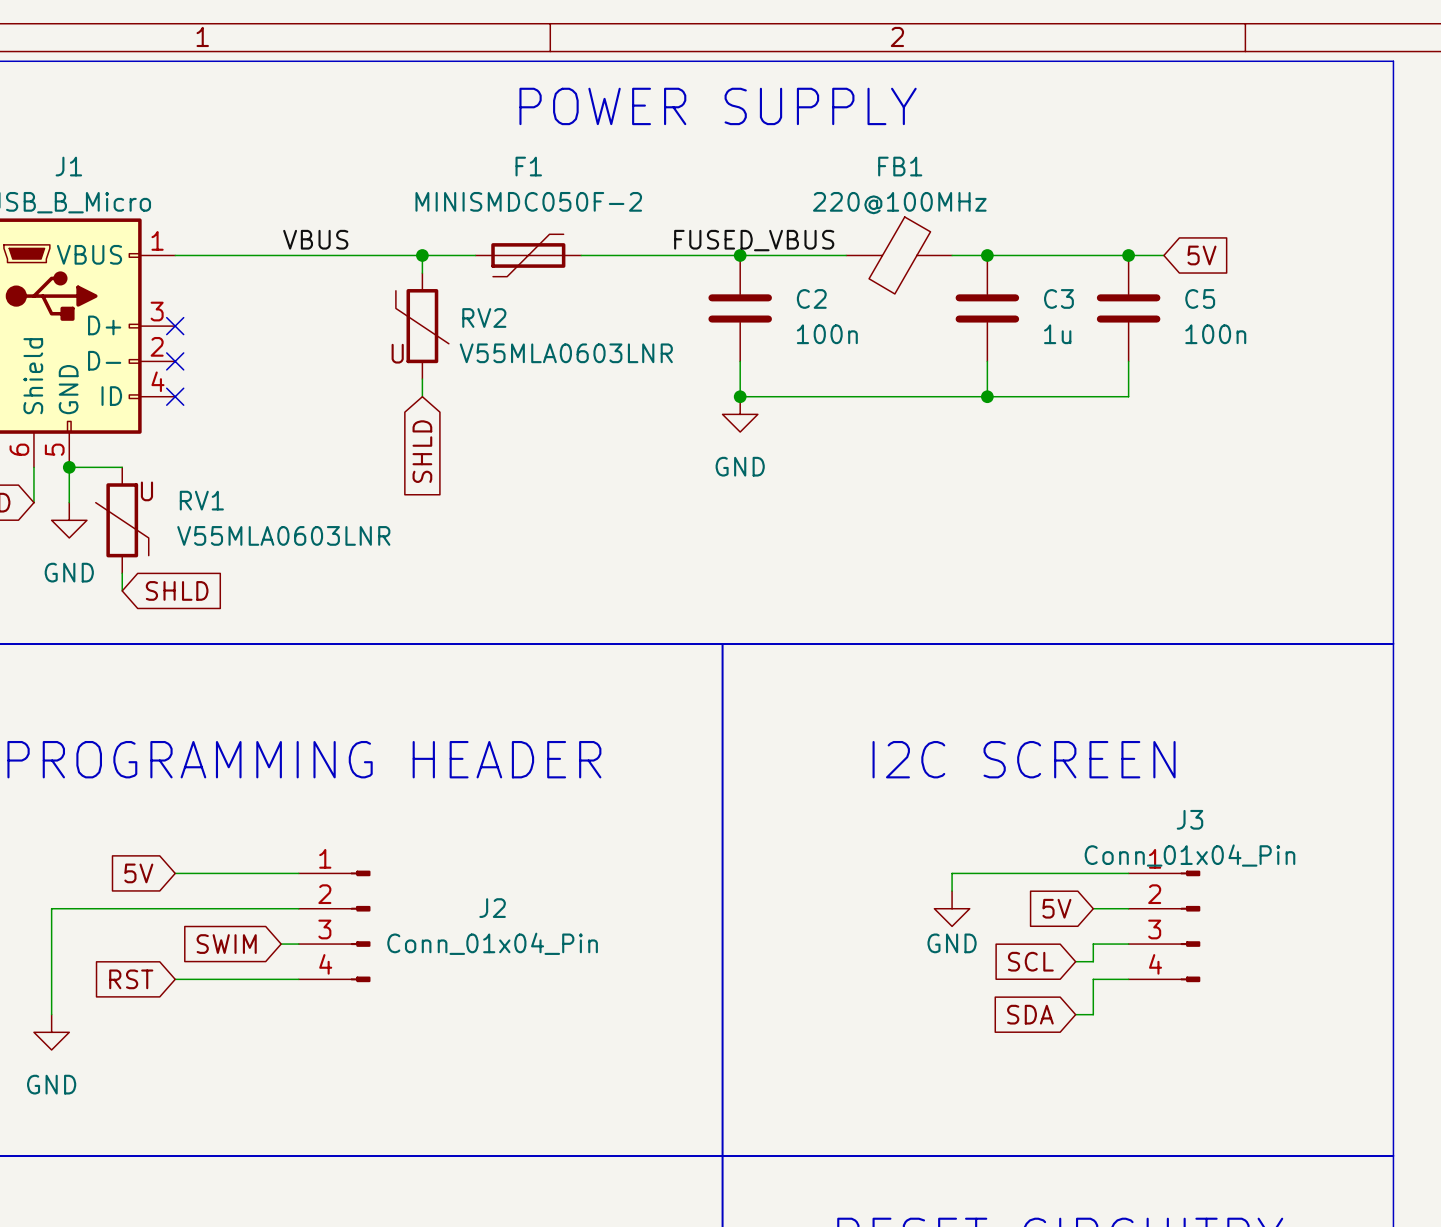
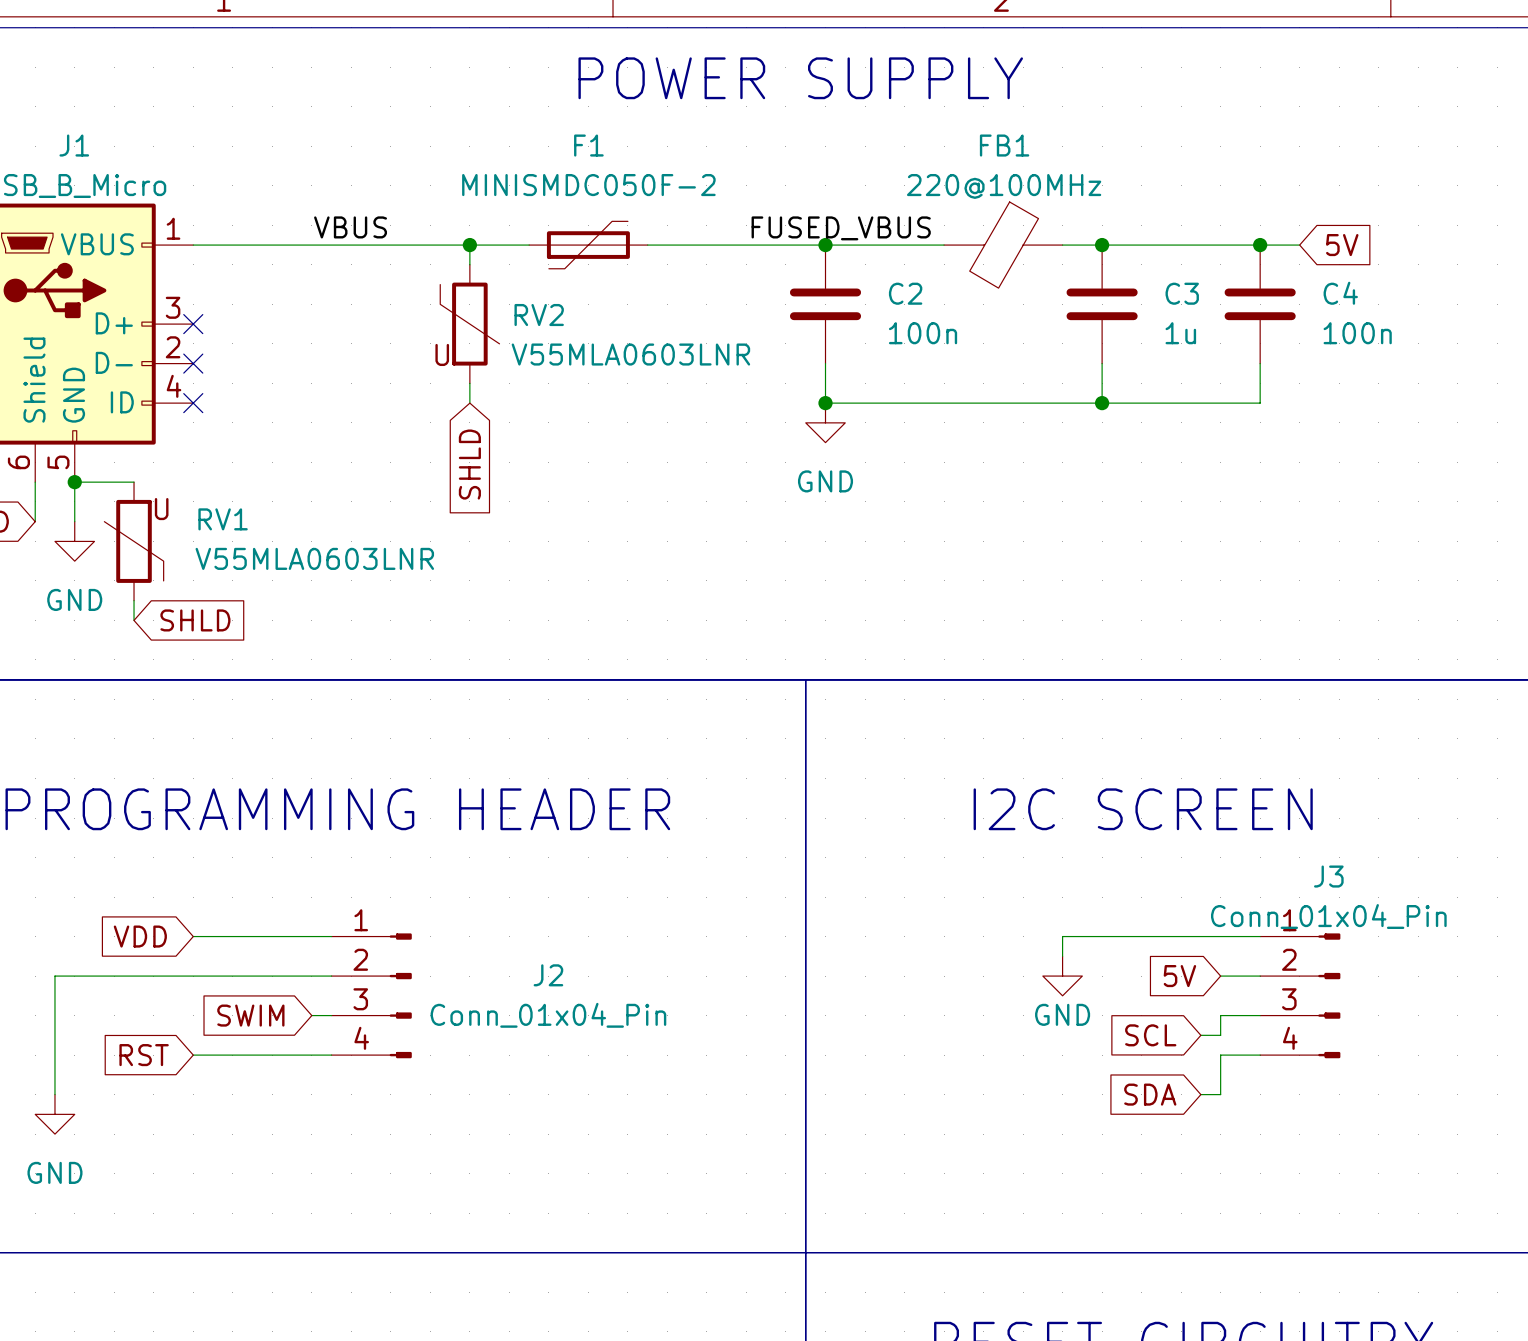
C5 name: C5 (1200, 298) -> C4 (1340, 293)
global label: 5V (138, 873) -> VDD (140, 936)

